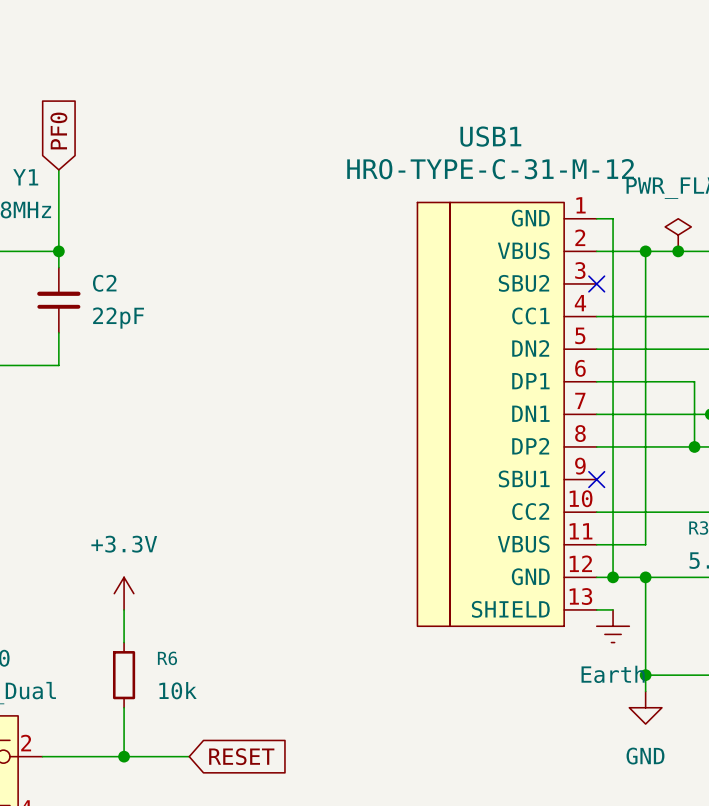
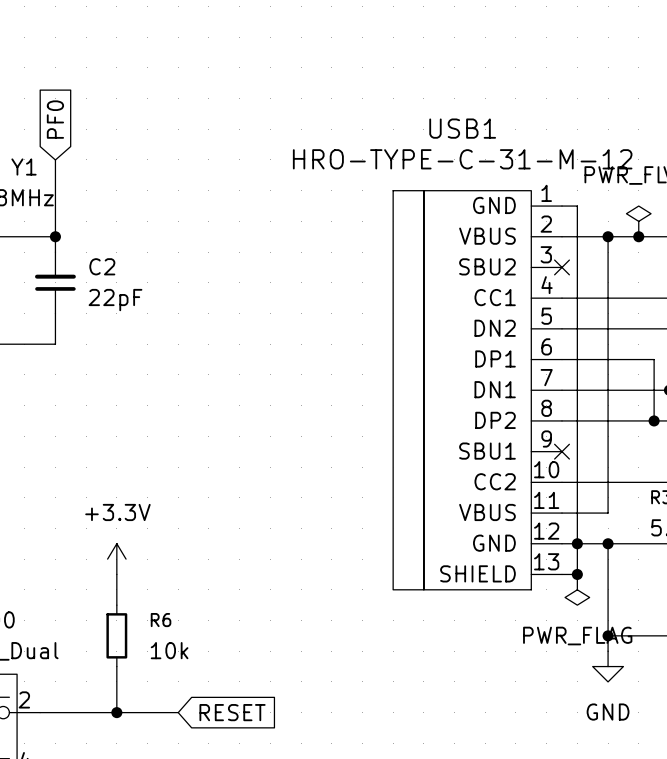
wire: none -> (577, 543) (577, 574)
junction: none -> (577, 574)
power symbol: Earth (613, 626) -> PWR_FLAG (577, 589)

